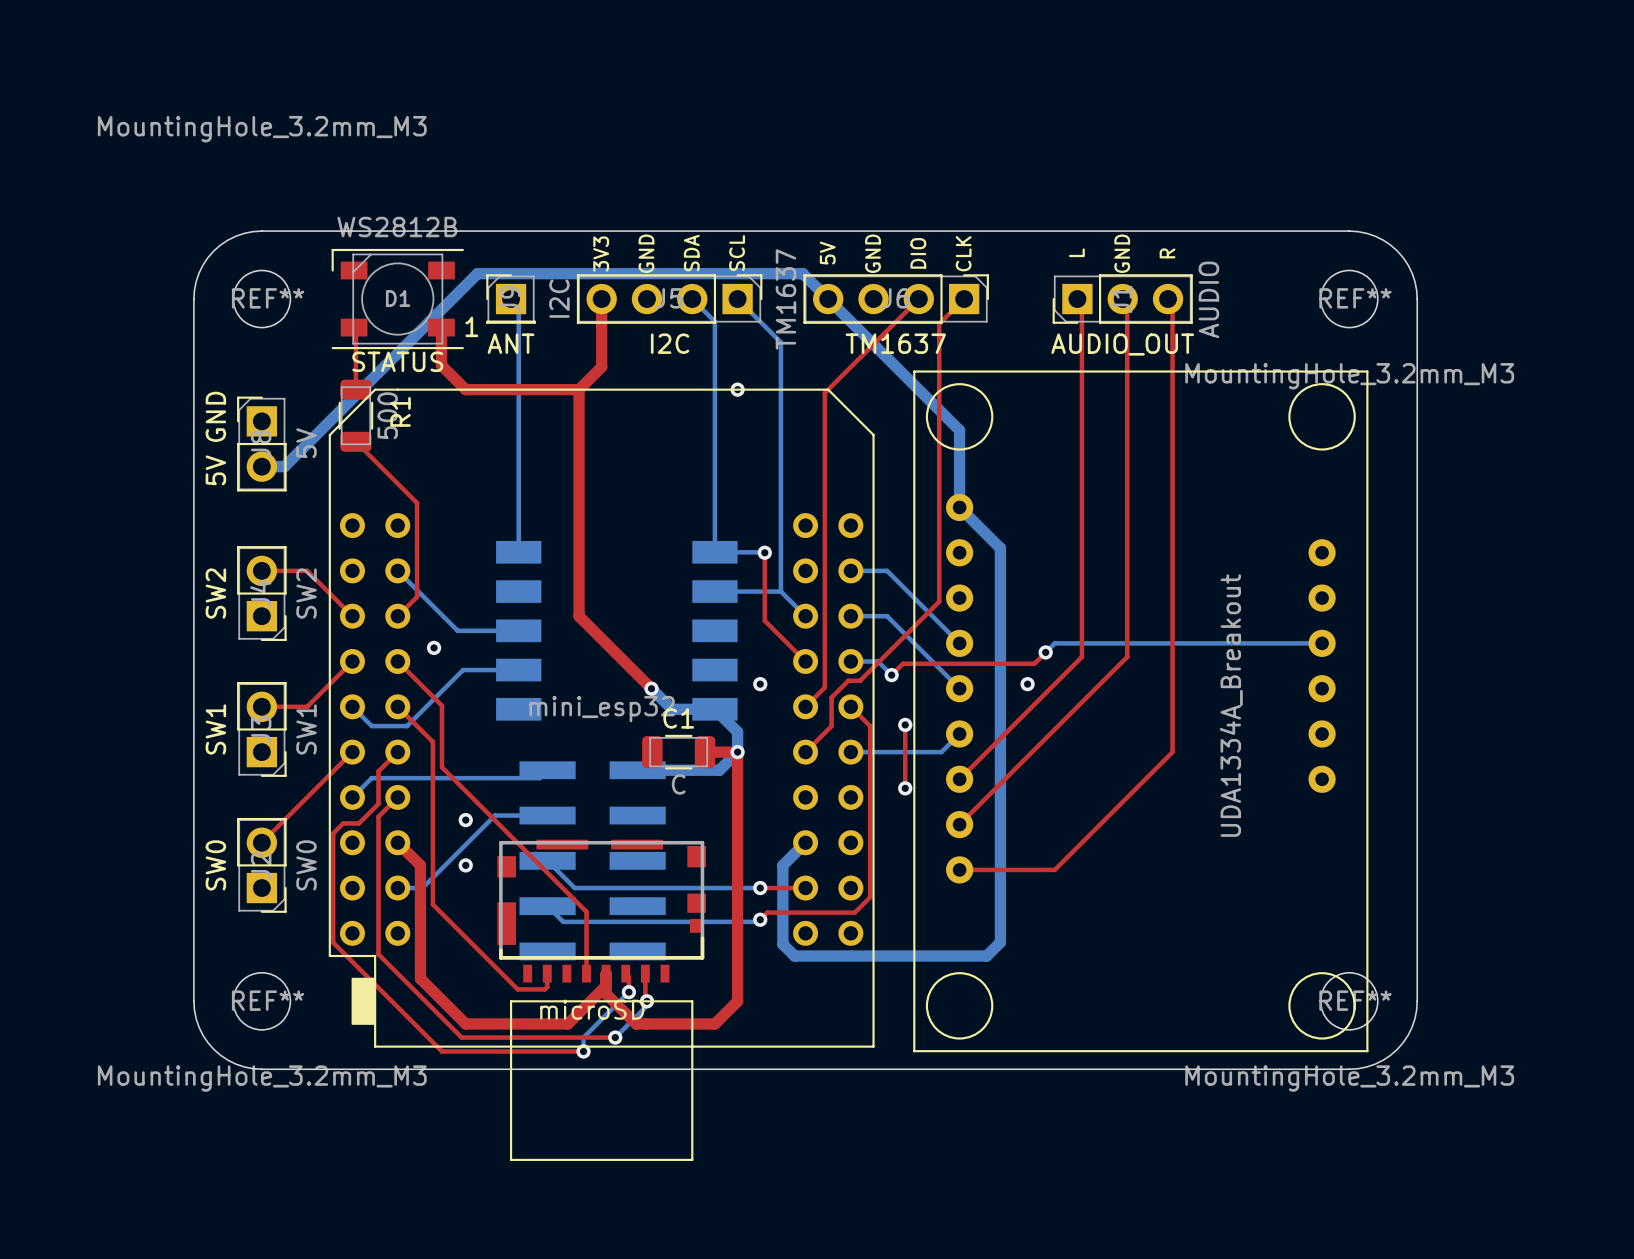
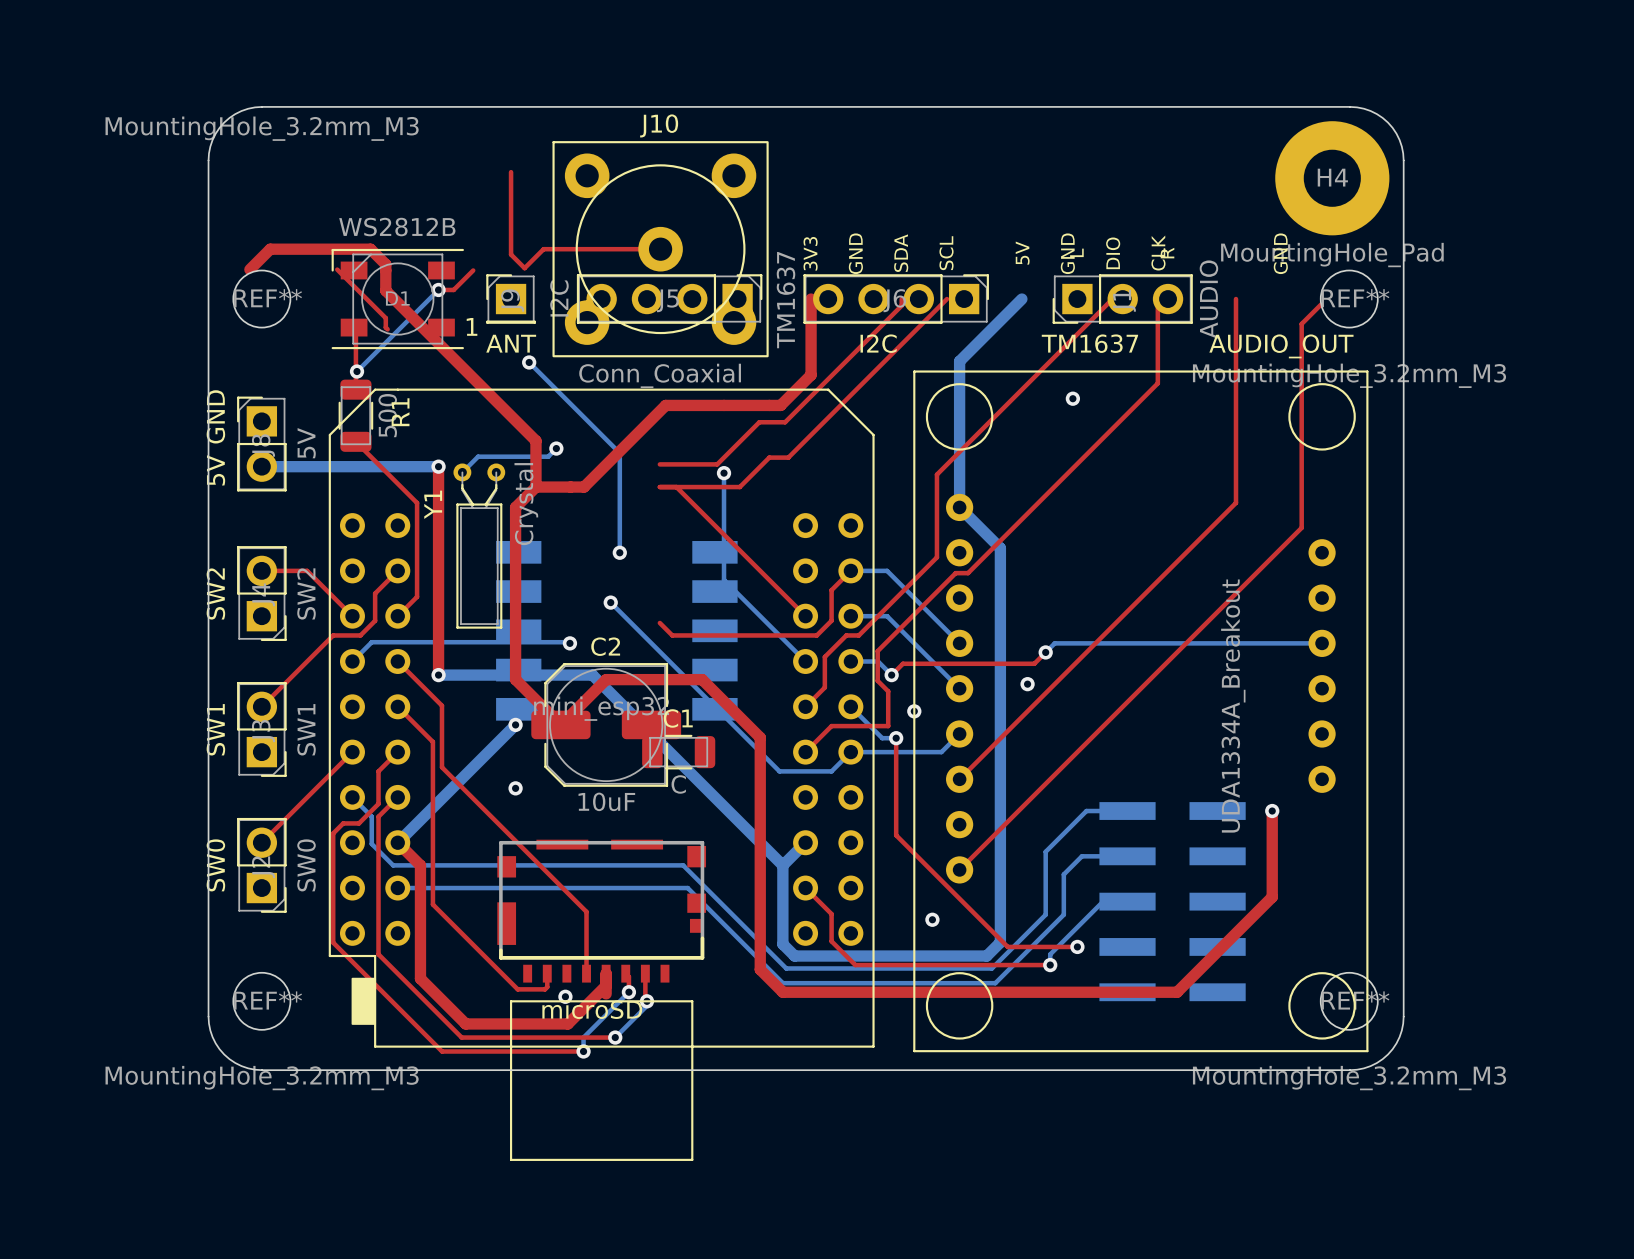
top track: none -> (511, 172) (511, 254) (524, 268) (543, 249) (660, 249)
H4: none -> MountingHole_Pad (1332, 178)
board edge: (261, 231) (1349, 231) (1366, 233) (1390, 245) (1403, 257) (1412, 273) (1417, 299) (1417, 1001) (1412, 1027) (1403, 1042) (1390, 1055) (1375, 1064) (1349, 1069) (261, 1069) (235, 1064) (220, 1055) (203, 1035) (196, 1018) (193, 1001) (193, 299) (199, 273) (213, 250) (235, 236) (261, 231) -> (262, 106) (241, 110) (224, 122) (212, 139) (208, 160) (208, 1016) (210, 1030) (215, 1043) (229, 1059) (248, 1068) (262, 1070) (1350, 1070) (1370, 1066) (1382, 1059) (1392, 1049) (1399, 1037) (1403, 1016) (1403, 160) (1401, 146) (1396, 133) (1382, 117) (1370, 110) (1350, 106) (262, 106)
J10: none -> Conn_Coaxial (660, 249)
text: GND (646, 253) -> none
text position: SDA (691, 253) -> SDA (901, 253)
text position: SCL (737, 253) -> SCL (946, 253)
text position: 5V (827, 253) -> 5V (1022, 253)
text position: GND (873, 253) -> GND (855, 253)
text position: DIO (918, 253) -> DIO (1113, 253)
text position: CLK (963, 253) -> CLK (1158, 253)
text position: GND (1122, 253) -> GND (1067, 253)
text: none -> GND (1280, 253)
text position: 3V3 (601, 254) -> 3V3 (810, 253)
top track: none -> (249, 269) (270, 249) (370, 249) (385, 264) (385, 290) (535, 440) (535, 487)
top track: none -> (337, 269) (385, 318) (385, 327) (387, 329)
top track: none -> (473, 270) (453, 289) (438, 289)
bottom track: none -> (438, 289) (357, 371)
via: none -> (438, 289)
bottom track: (511, 299) (518, 306) (518, 552) -> none
top track: (601, 299) (601, 367) (579, 389) -> none
bottom track: (692, 299) (714, 321) (714, 552) (764, 552) -> none
bottom track: (737, 299) (780, 342) (780, 591) -> none
top track: none -> (811, 299) (811, 375) (780, 405) (665, 405) (584, 487) (535, 487)
top track: none -> (901, 299) (901, 305) (785, 422) (759, 422) (717, 464) (659, 464)
top track: (918, 299) (824, 393) (824, 656) -> (1112, 299) (936, 474) (936, 557) (858, 635) (846, 635) (824, 656)
top track: none -> (947, 299) (788, 457) (769, 457) (739, 487) (659, 487)
top track: (964, 299) (939, 323) (939, 601) (860, 680) (848, 680) (831, 697) (831, 726) -> (1157, 299) (1157, 383) (968, 573) (955, 573) (877, 651) (877, 680) (888, 691) (888, 726) (831, 726)
bottom track: none -> (1021, 299) (959, 361) (959, 430)
top track: (1081, 299) (1081, 656) -> (1235, 299) (1235, 502) (1081, 656)
top track: (1127, 299) (1127, 656) (959, 824) -> none
top track: (1172, 299) (1172, 752) (1054, 869) (959, 869) -> (1326, 299) (1301, 323) (1301, 527) (959, 869)
top track: (441, 327) (441, 365) (465, 389) (579, 389) -> none
text position: I2C (670, 343) -> I2C (878, 343)
text position: TM1637 (895, 343) -> TM1637 (1089, 343)
text position: AUDIO_OUT (1122, 344) -> AUDIO_OUT (1281, 346)
text: STATUS (397, 361) -> none
bottom track: none -> (529, 362) (619, 453) (619, 552)
via: none -> (529, 362)
via: none -> (357, 371)
top track: (579, 389) (579, 616) (651, 688) -> none
via: (737, 389) -> none
via: none -> (1072, 398)
bottom track: (959, 430) (802, 273) (477, 273) (284, 466) -> (438, 466) (284, 466)
bottom track: none -> (556, 448) (548, 456) (478, 456) (462, 472)
via: none -> (556, 448)
top track: none -> (438, 466) (438, 675)
via: none -> (438, 466)
bottom track: none -> (724, 473) (724, 579) (805, 661)
via: none -> (724, 473)
top track: none -> (535, 487) (515, 507) (515, 679) (560, 724) (606, 679) (702, 679) (760, 737) (760, 969) (782, 992) (1177, 992) (1272, 897) (1272, 811)
top track: none -> (676, 487) (805, 616)
Y1: none -> Crystal (479, 546)
via: none -> (619, 552)
top track: (764, 552) (764, 620) (805, 661) -> none
via: (764, 552) -> none
bottom track: (397, 570) (457, 630) (518, 630) -> none
top track: none -> (850, 570) (831, 590) (831, 620) (816, 635) (672, 635) (659, 622)
bottom track: (714, 591) (780, 591) -> none
bottom track: (780, 591) (805, 616) -> none
bottom track: none -> (610, 602) (779, 771) (831, 771) (850, 752)
via: none -> (610, 602)
bottom track: none -> (569, 643) (371, 642) (352, 661)
via: none -> (569, 643)
via position: (434, 647) -> (438, 675)
top track: (352, 661) (307, 706) (261, 706) -> (397, 570) (375, 593) (375, 620) (360, 635) (333, 635) (261, 706)
bottom track: (518, 670) (463, 670) (407, 726) (371, 726) (352, 706) -> none
bottom track: none -> (438, 675) (592, 675) (782, 865)
via: (760, 684) -> none
bottom track: (651, 688) (672, 709) (714, 709) (737, 731) (737, 752) (719, 770) (637, 770) -> none
via: (651, 688) -> none
top track: (850, 706) (870, 726) (870, 897) (854, 912) (767, 912) (760, 919) -> none
bottom track: none -> (850, 706) (882, 738) (896, 738)
via: none -> (914, 711)
bottom track: none -> (515, 724) (397, 842)
via: none -> (515, 724)
C2: none -> 10uF (606, 724)
top track: (905, 724) (905, 788) -> none
via: (905, 724) -> none
top track: none -> (896, 738) (896, 835) (1007, 946) (1077, 946)
via: none -> (896, 738)
top track: (705, 752) (737, 752) (737, 1001) (714, 1023) (636, 1023) (606, 993) -> none
via: (737, 752) -> none
bottom track: (547, 770) (539, 778) (371, 778) (352, 797) -> (1127, 811) (1086, 811) (1045, 851) (1045, 914) (991, 968) (786, 968) (683, 865) (393, 865) (371, 843) (371, 816) (352, 797)
via: none -> (515, 788)
via: (905, 788) -> none
via: none -> (1272, 811)
bottom track: (547, 815) (494, 815) (422, 888) -> (574, 888) (422, 888)
via: (465, 820) -> none
bottom track: (547, 860) (574, 888) -> none
part: (592, 860) -> none
via: (465, 865) -> none
bottom track: (687, 888) (760, 888) -> (687, 888) (782, 983) (995, 983) (1063, 914) (1063, 874) (1081, 856) (1127, 856)
top track: (760, 888) (805, 888) -> (1050, 965) (855, 965) (831, 941) (831, 914) (805, 888)
via: (760, 888) -> none
bottom track: none -> (1127, 901) (1103, 901) (1050, 954) (1050, 965)
part: none -> (1172, 901)
bottom track: (547, 906) (563, 921) (758, 921) (760, 919) -> none
via: (760, 919) -> none
via: none -> (932, 919)
via: none -> (1077, 946)
via: none -> (1050, 965)
via: none -> (565, 996)

